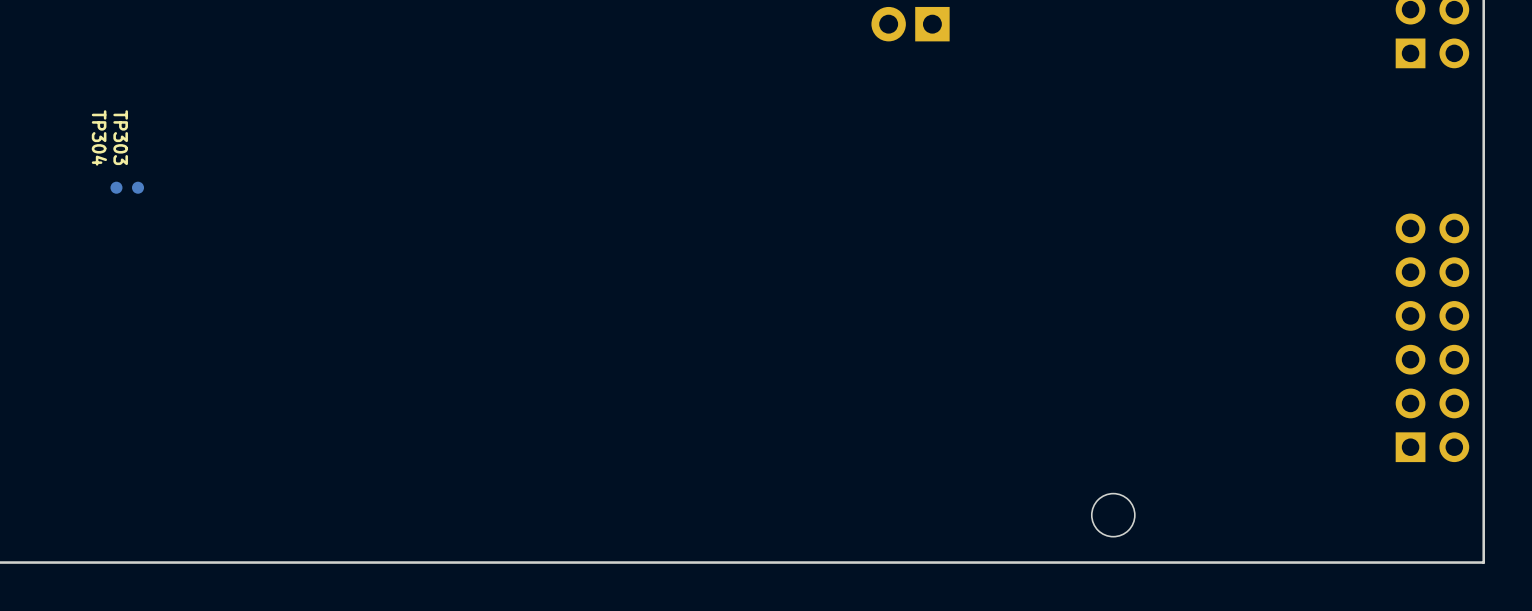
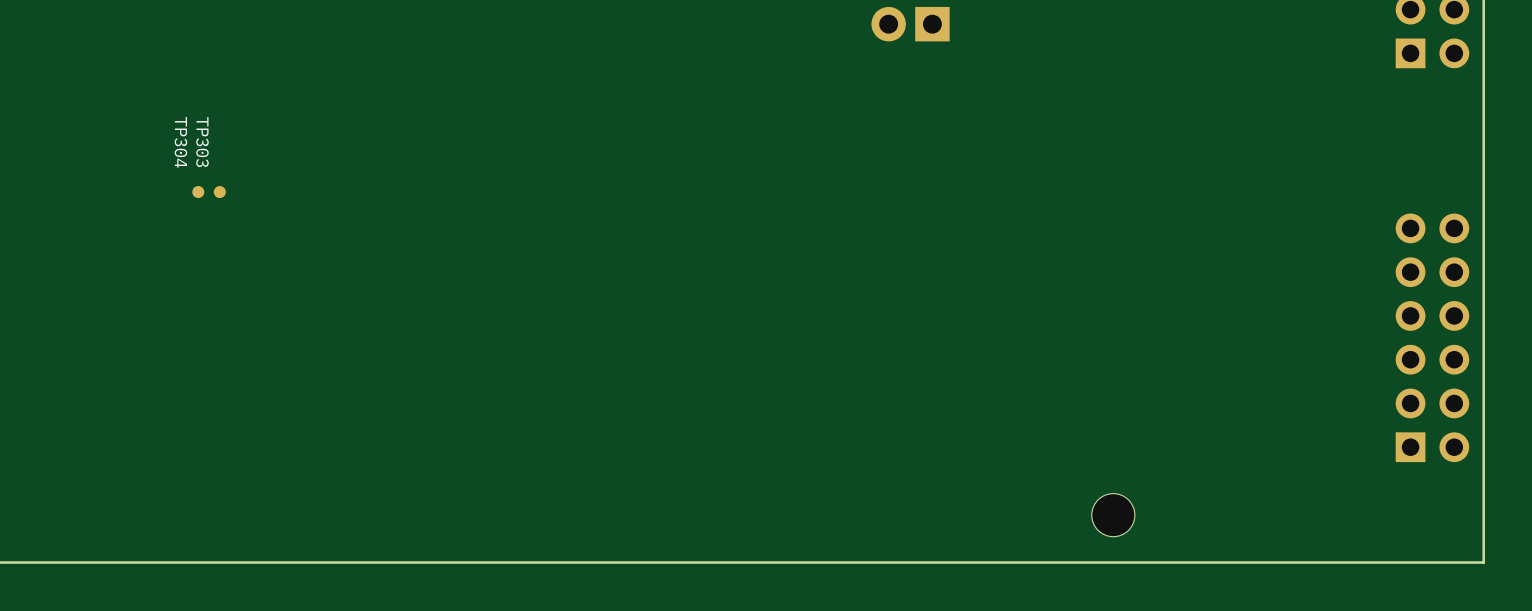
TP304 position: (116, 187) -> (198, 192)
TP303 position: (138, 187) -> (219, 192)

